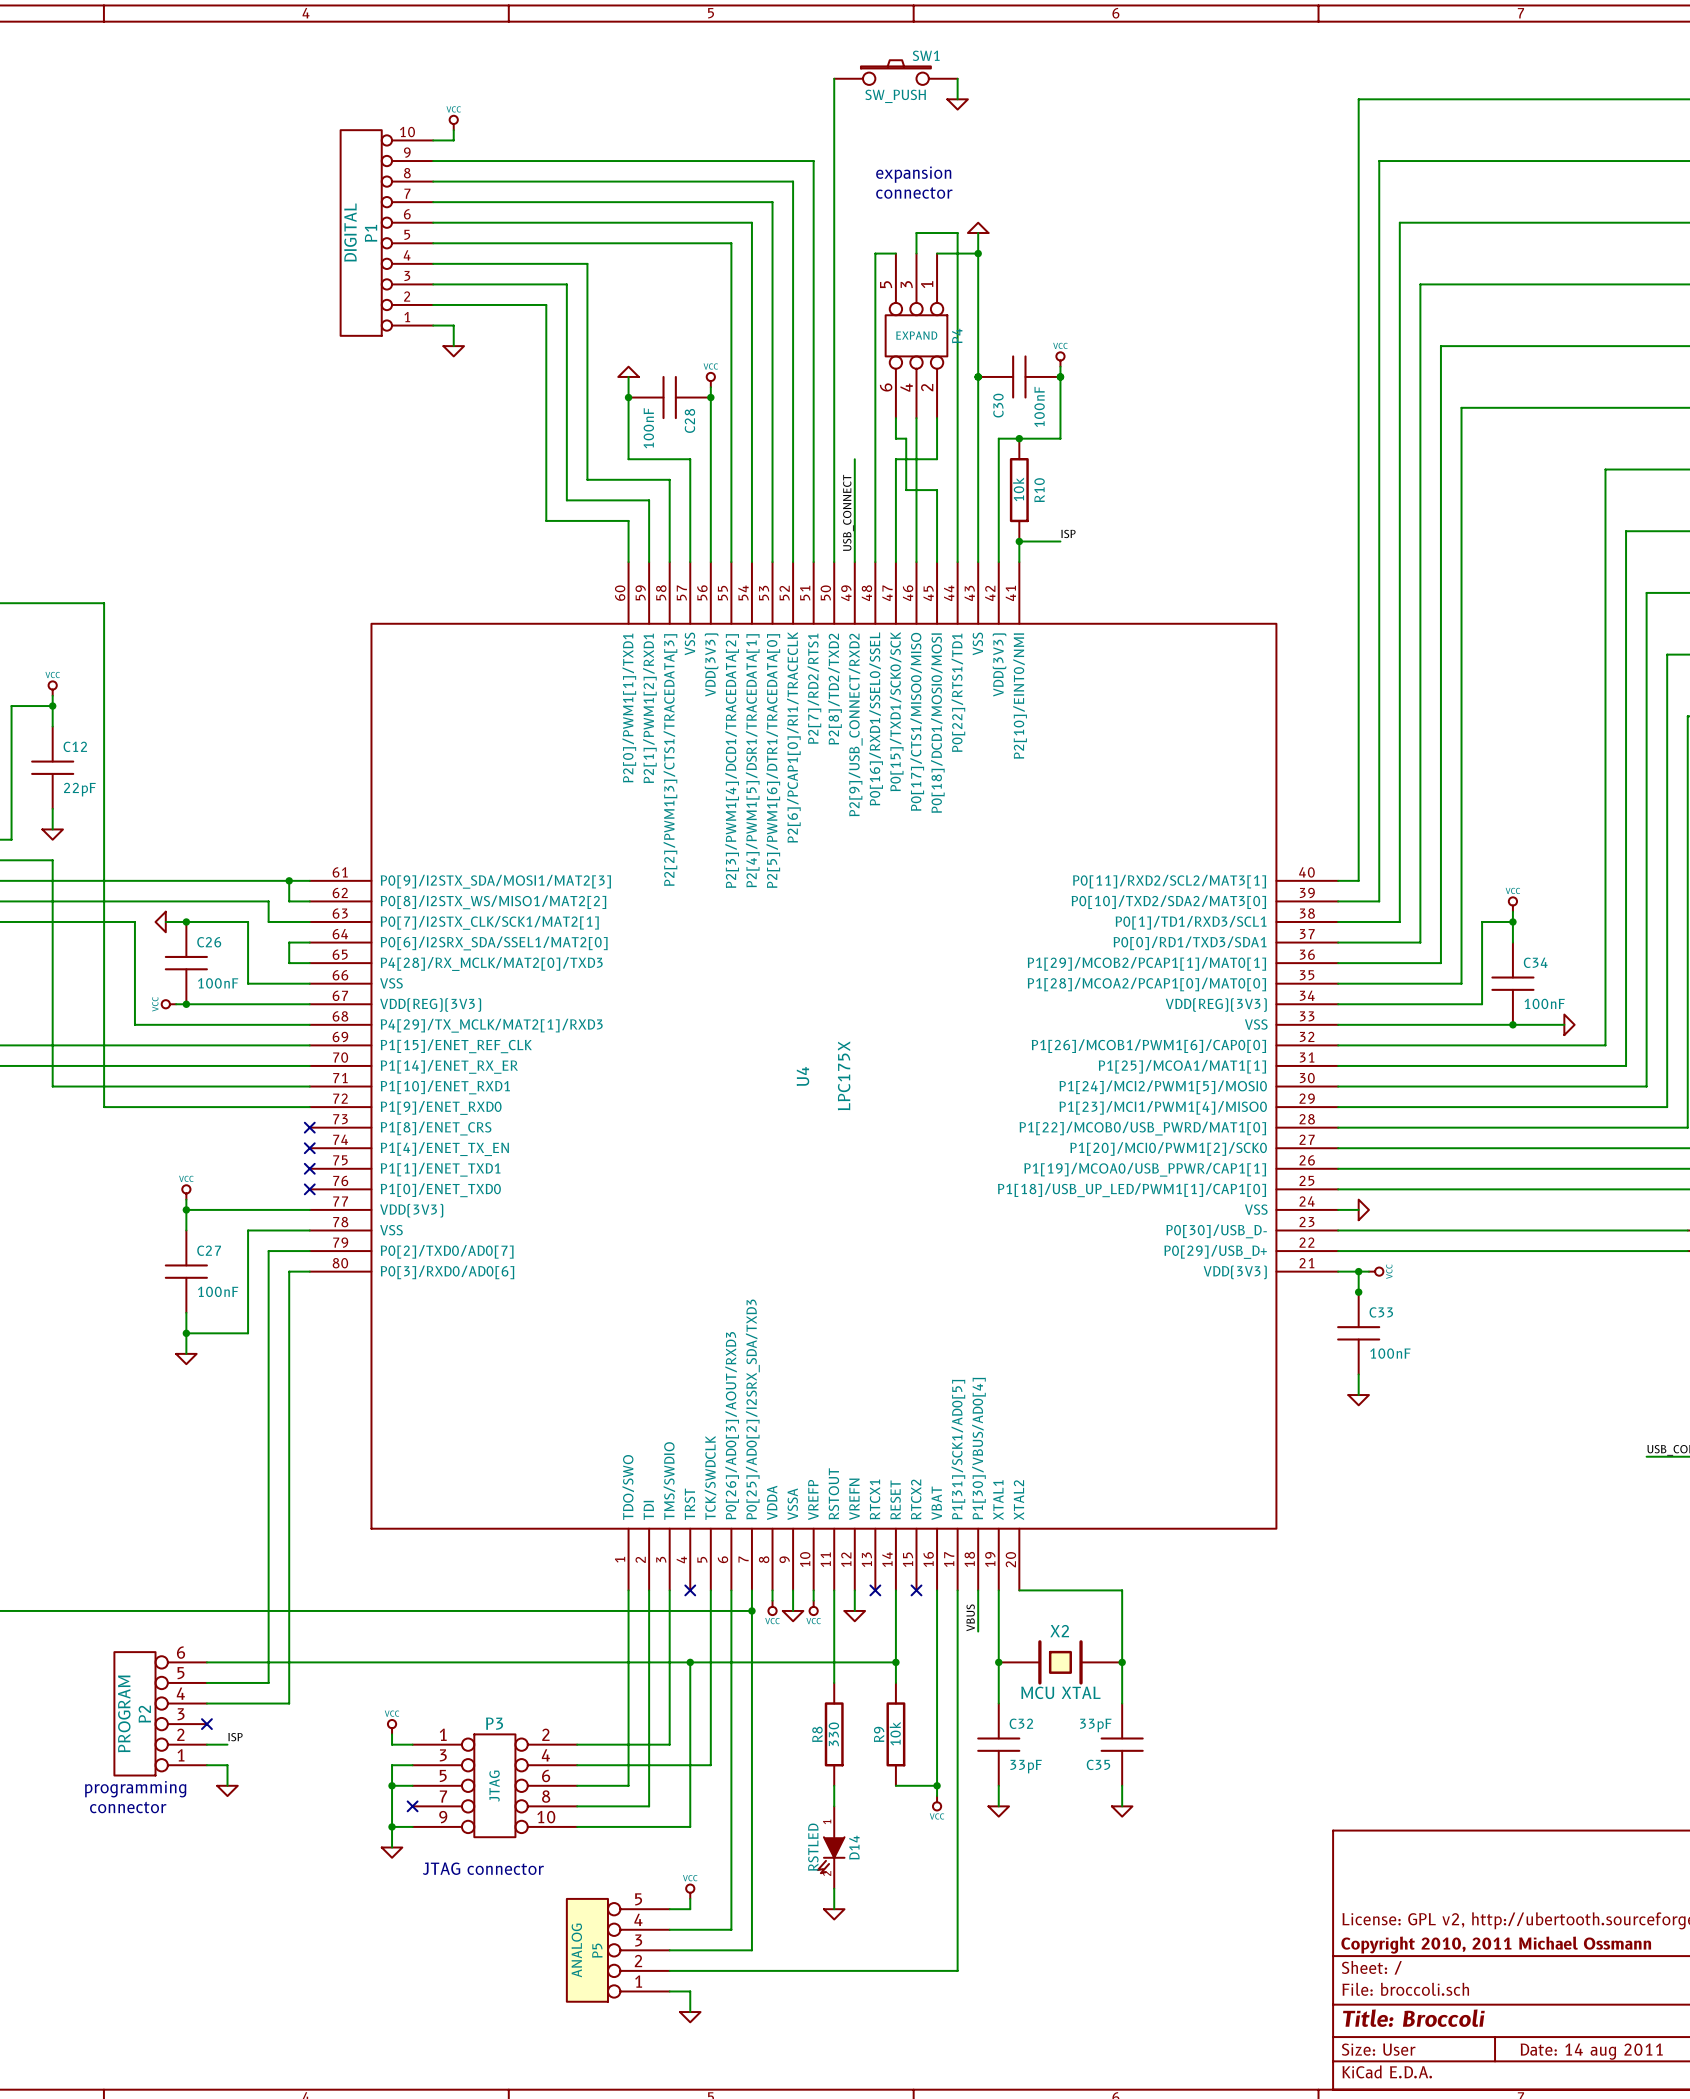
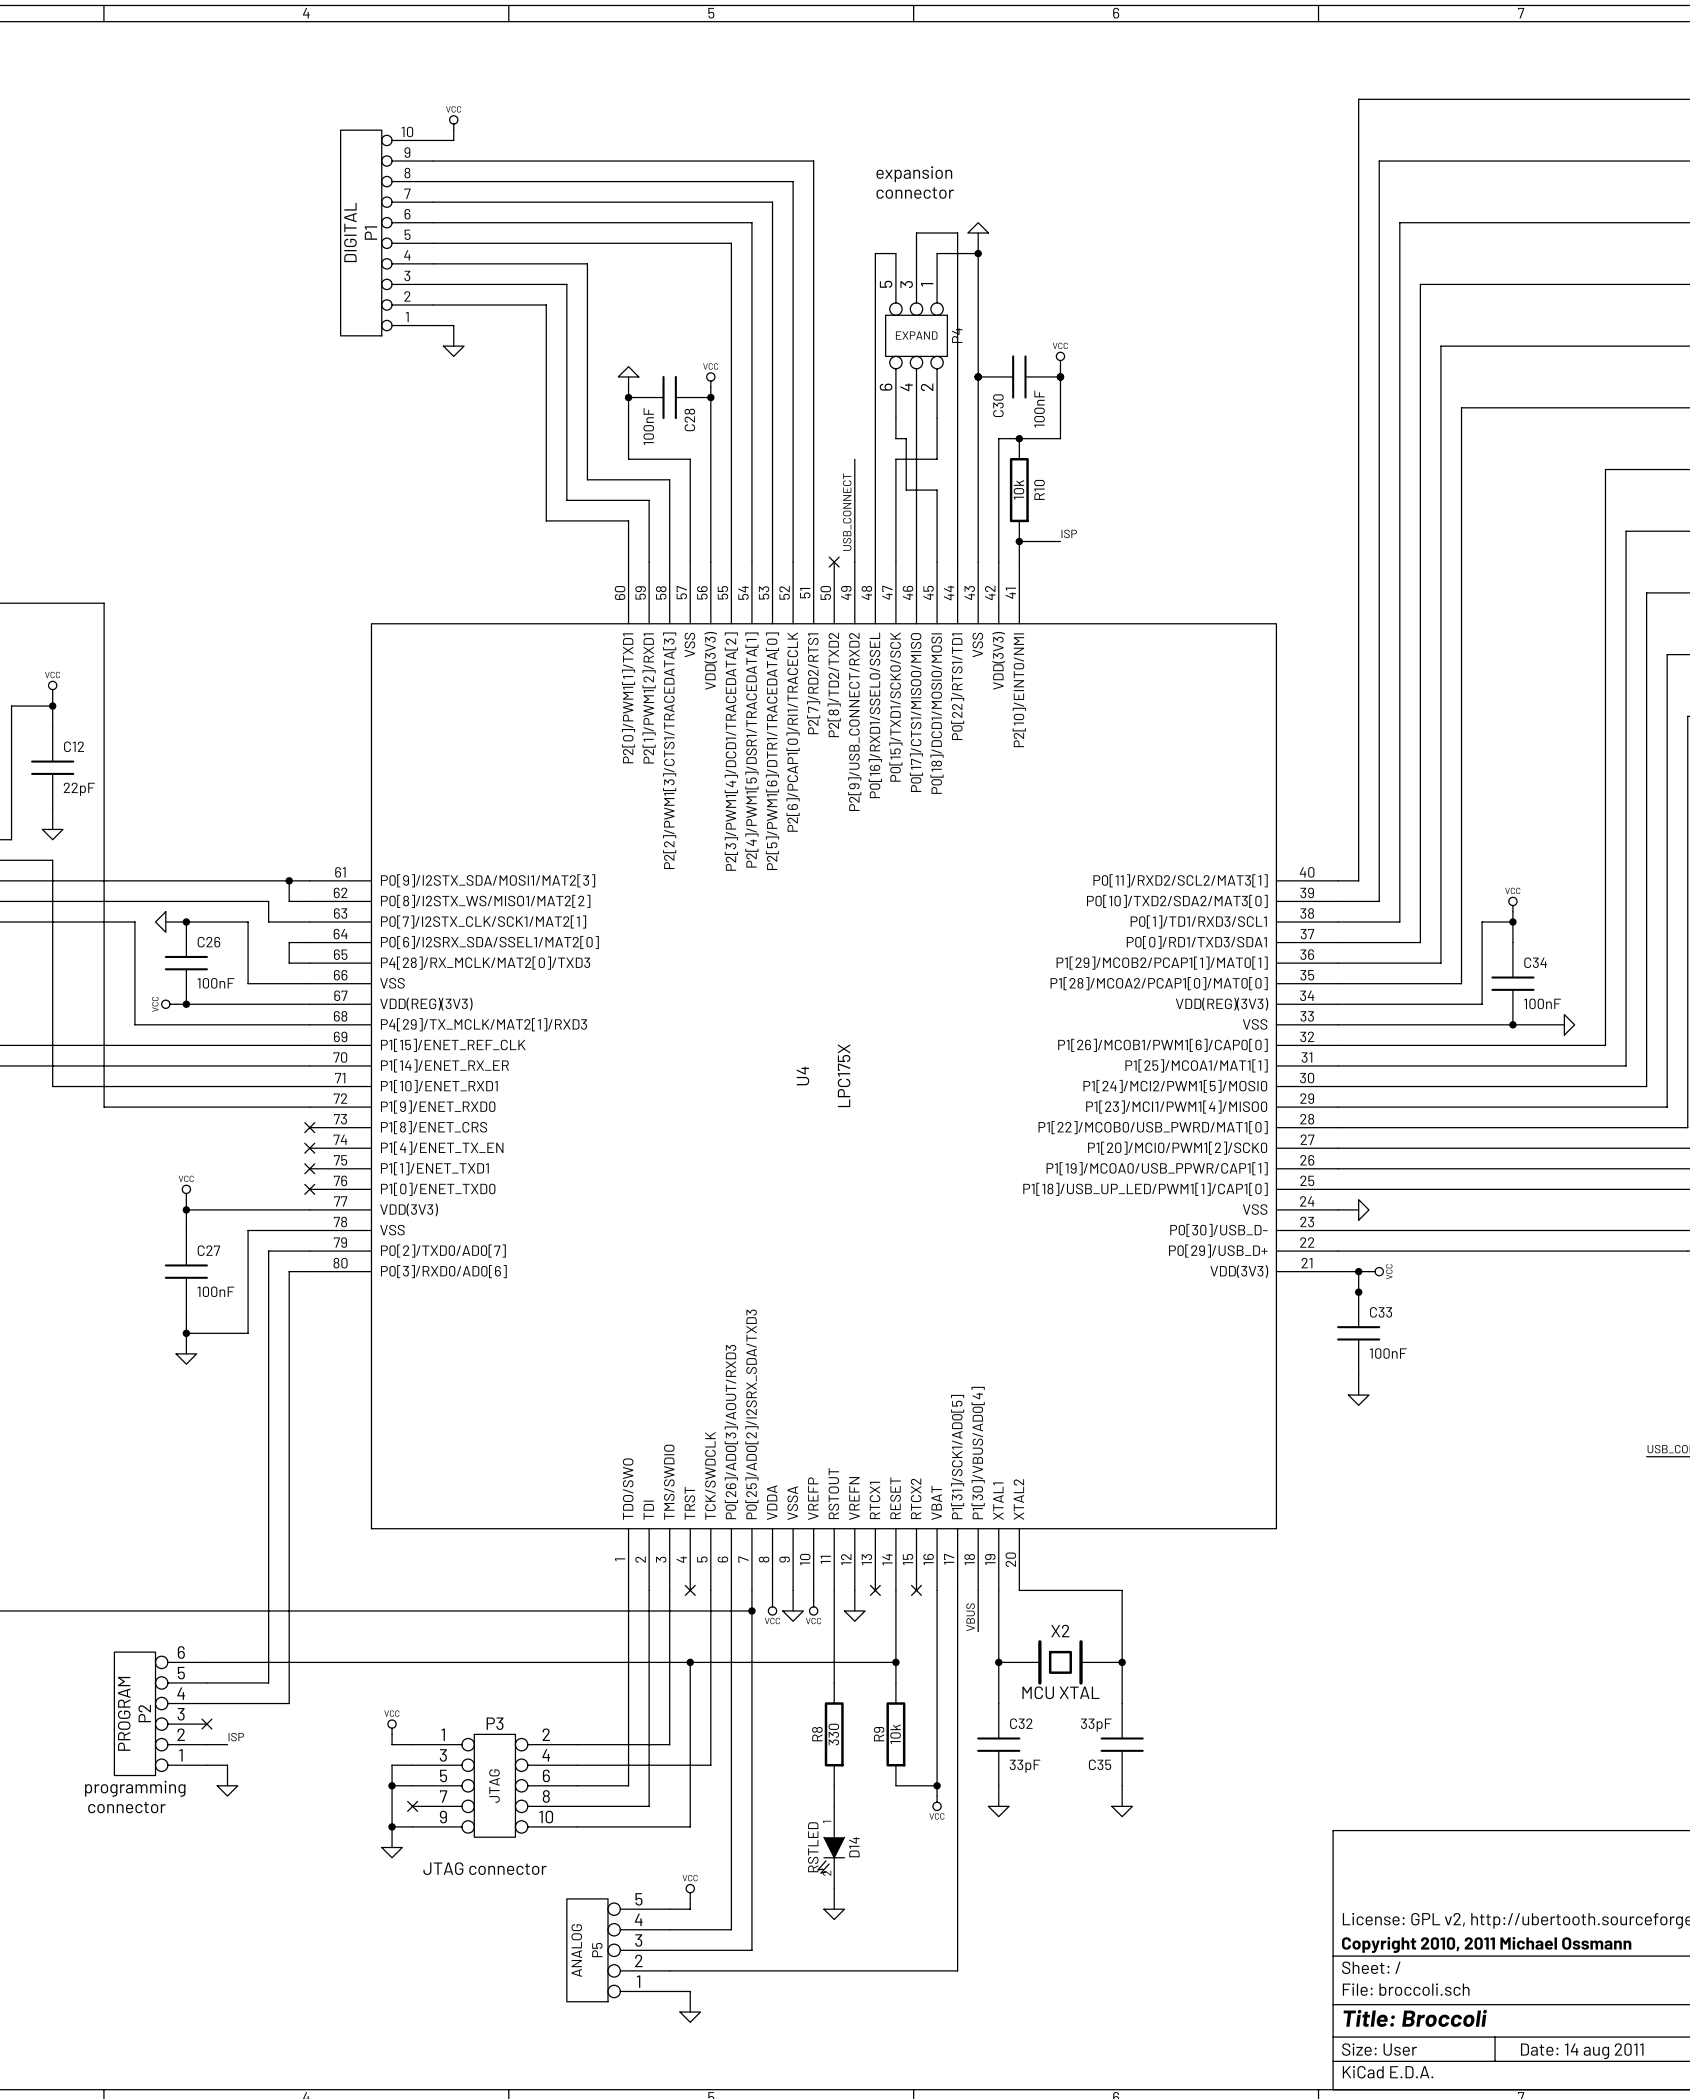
SW1: SW_PUSH (895, 72) -> none
wire: (834, 78) (834, 562) -> none
wire: (957, 78) (957, 99) -> none
power symbol: (957, 104) -> none
no-connect mark: none -> (834, 562)

